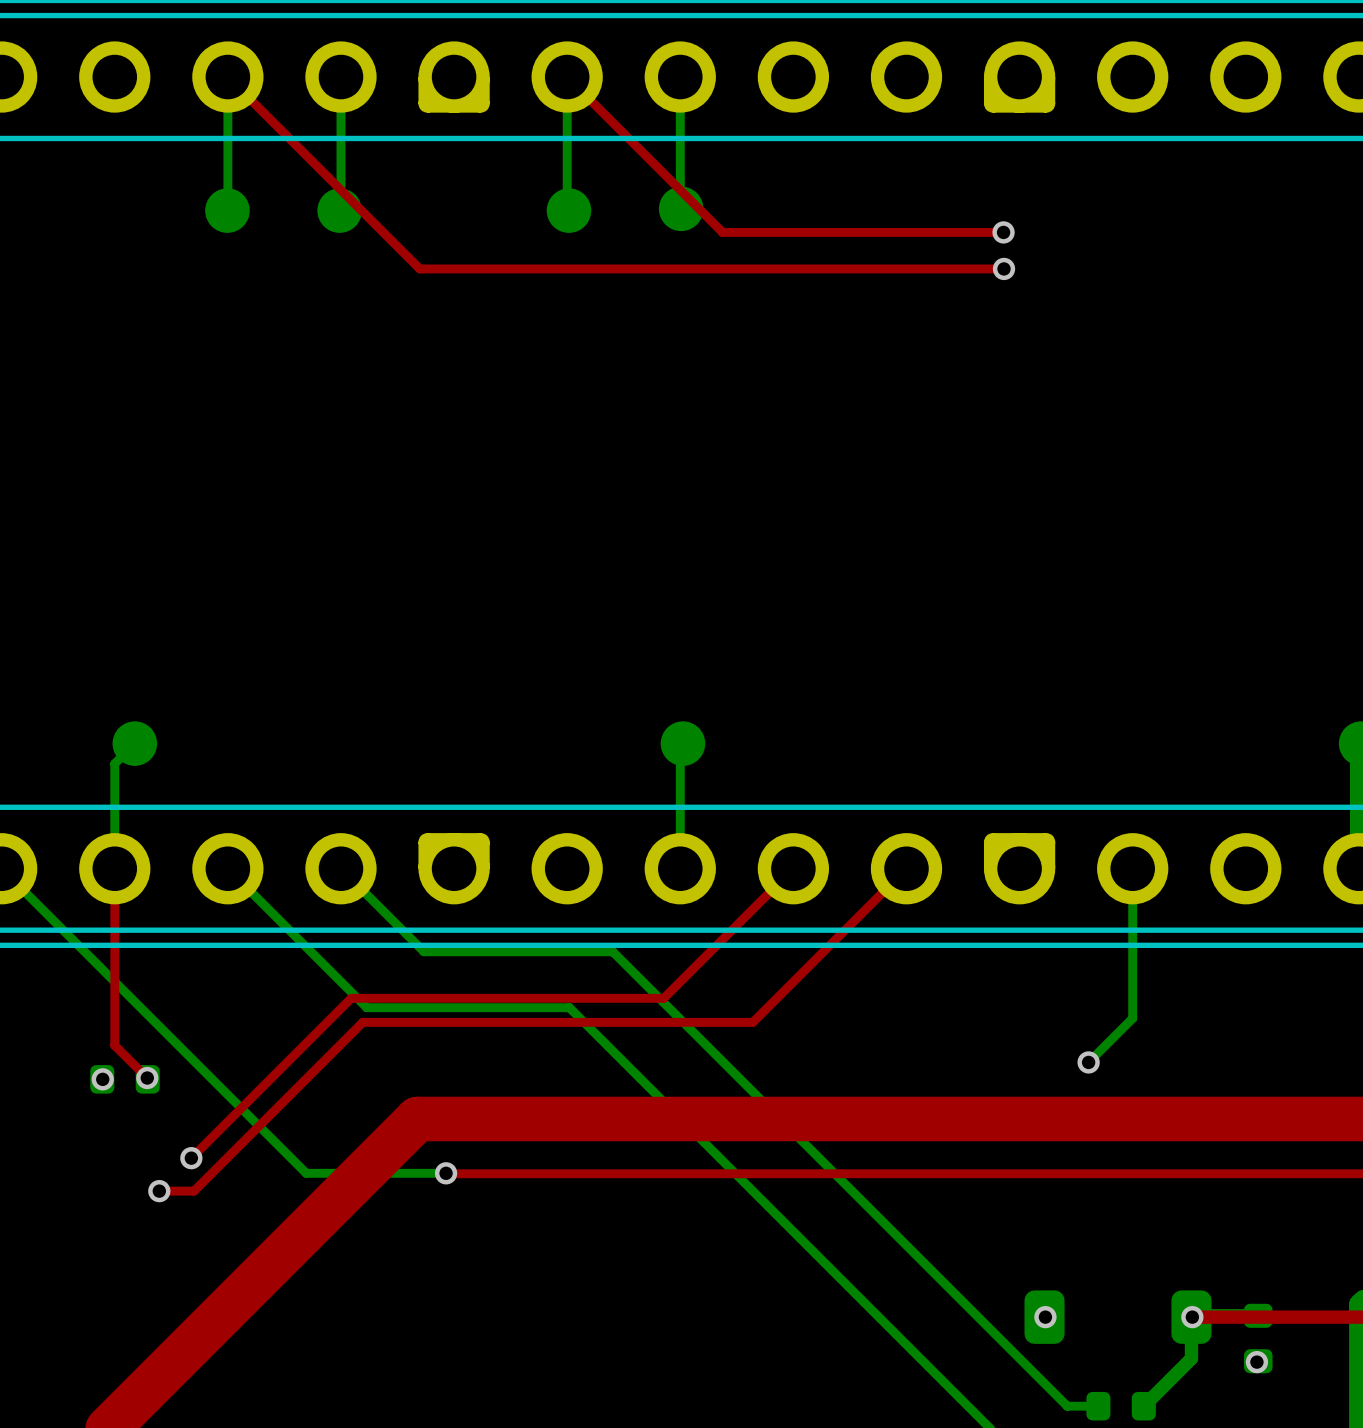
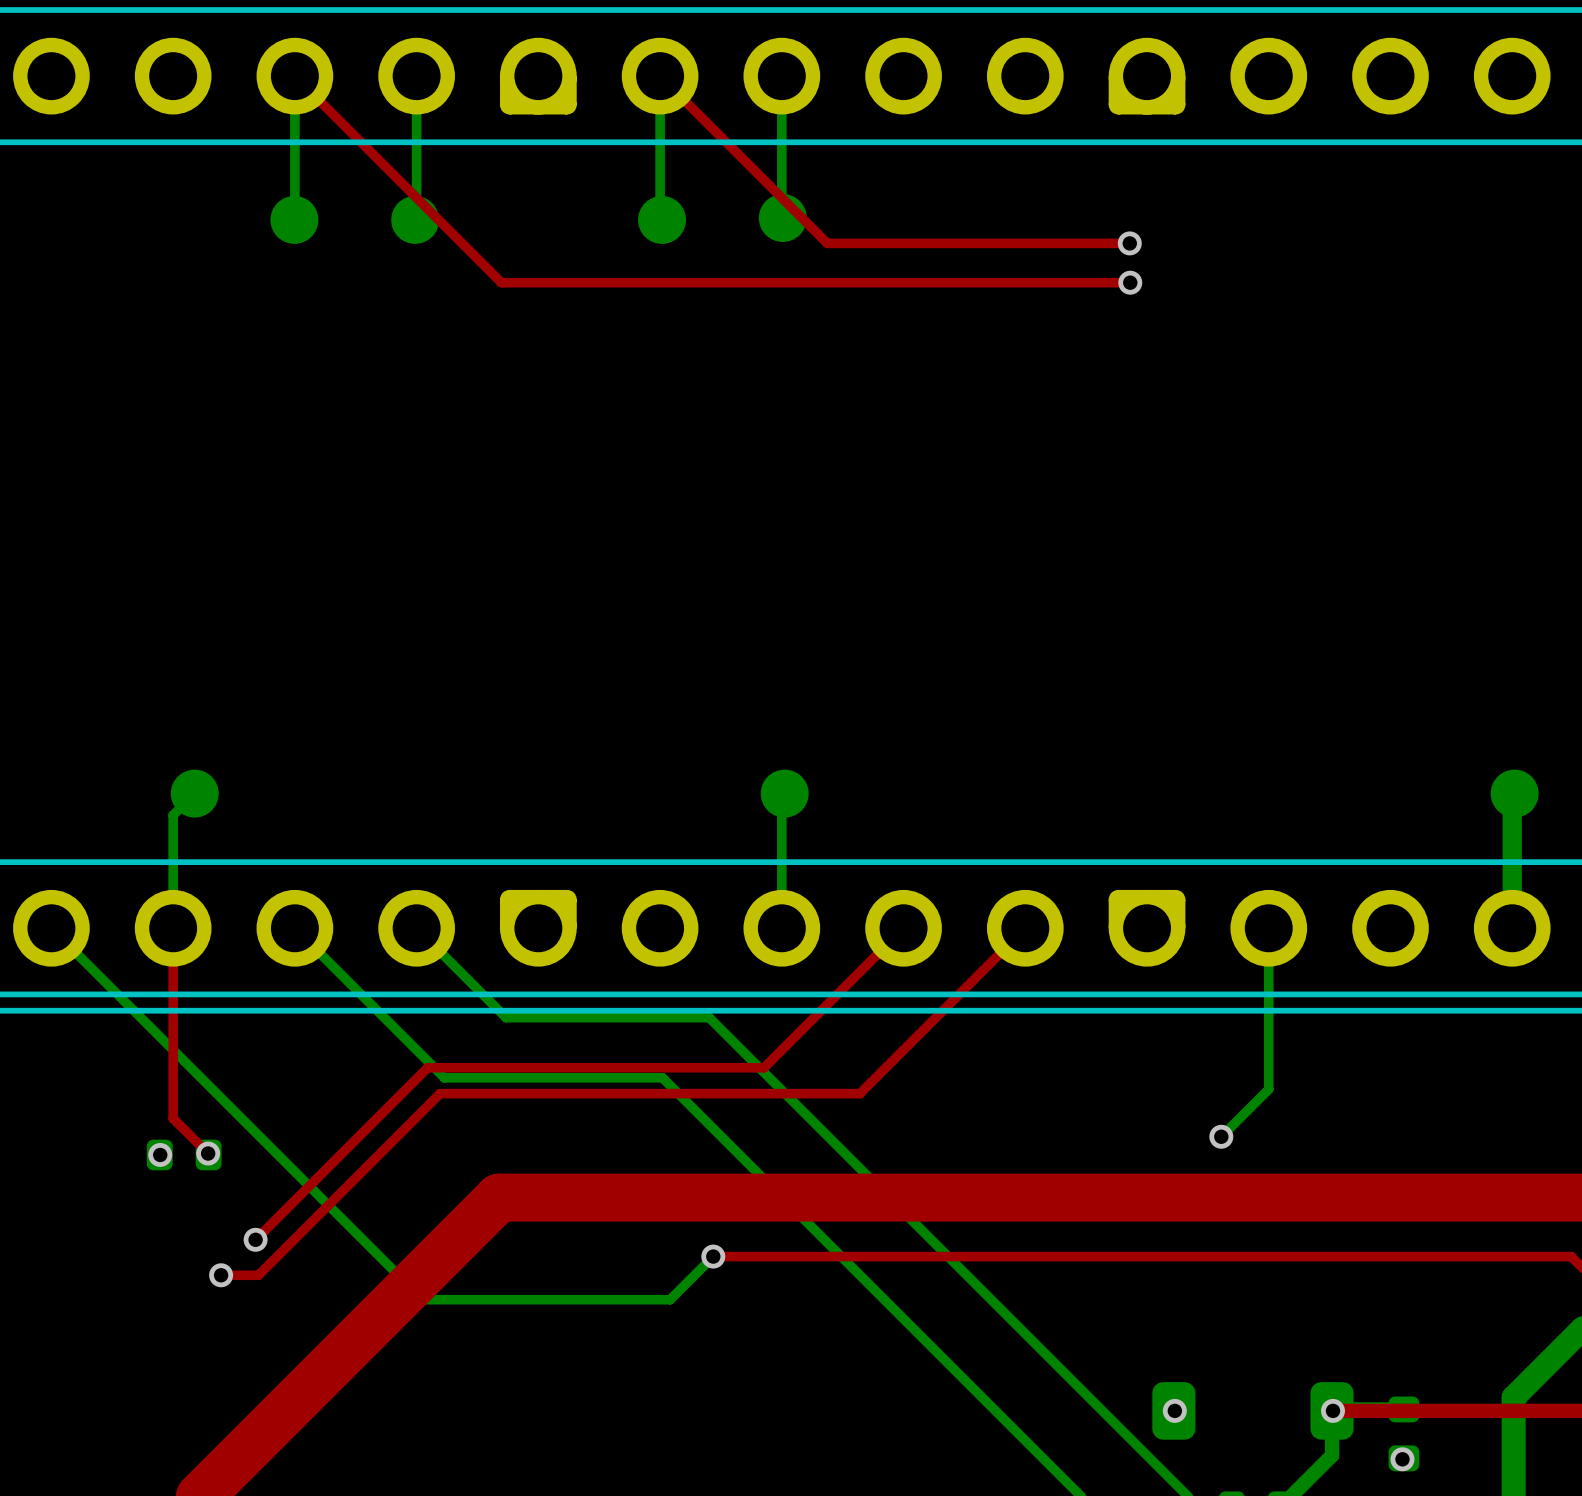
bottom track: (306, 1173) (446, 1173) -> (379, 1256) (422, 1299) (670, 1299) (713, 1256)
top track: (446, 1173) (616, 1173) -> none
via position: (446, 1173) -> (713, 1256)

